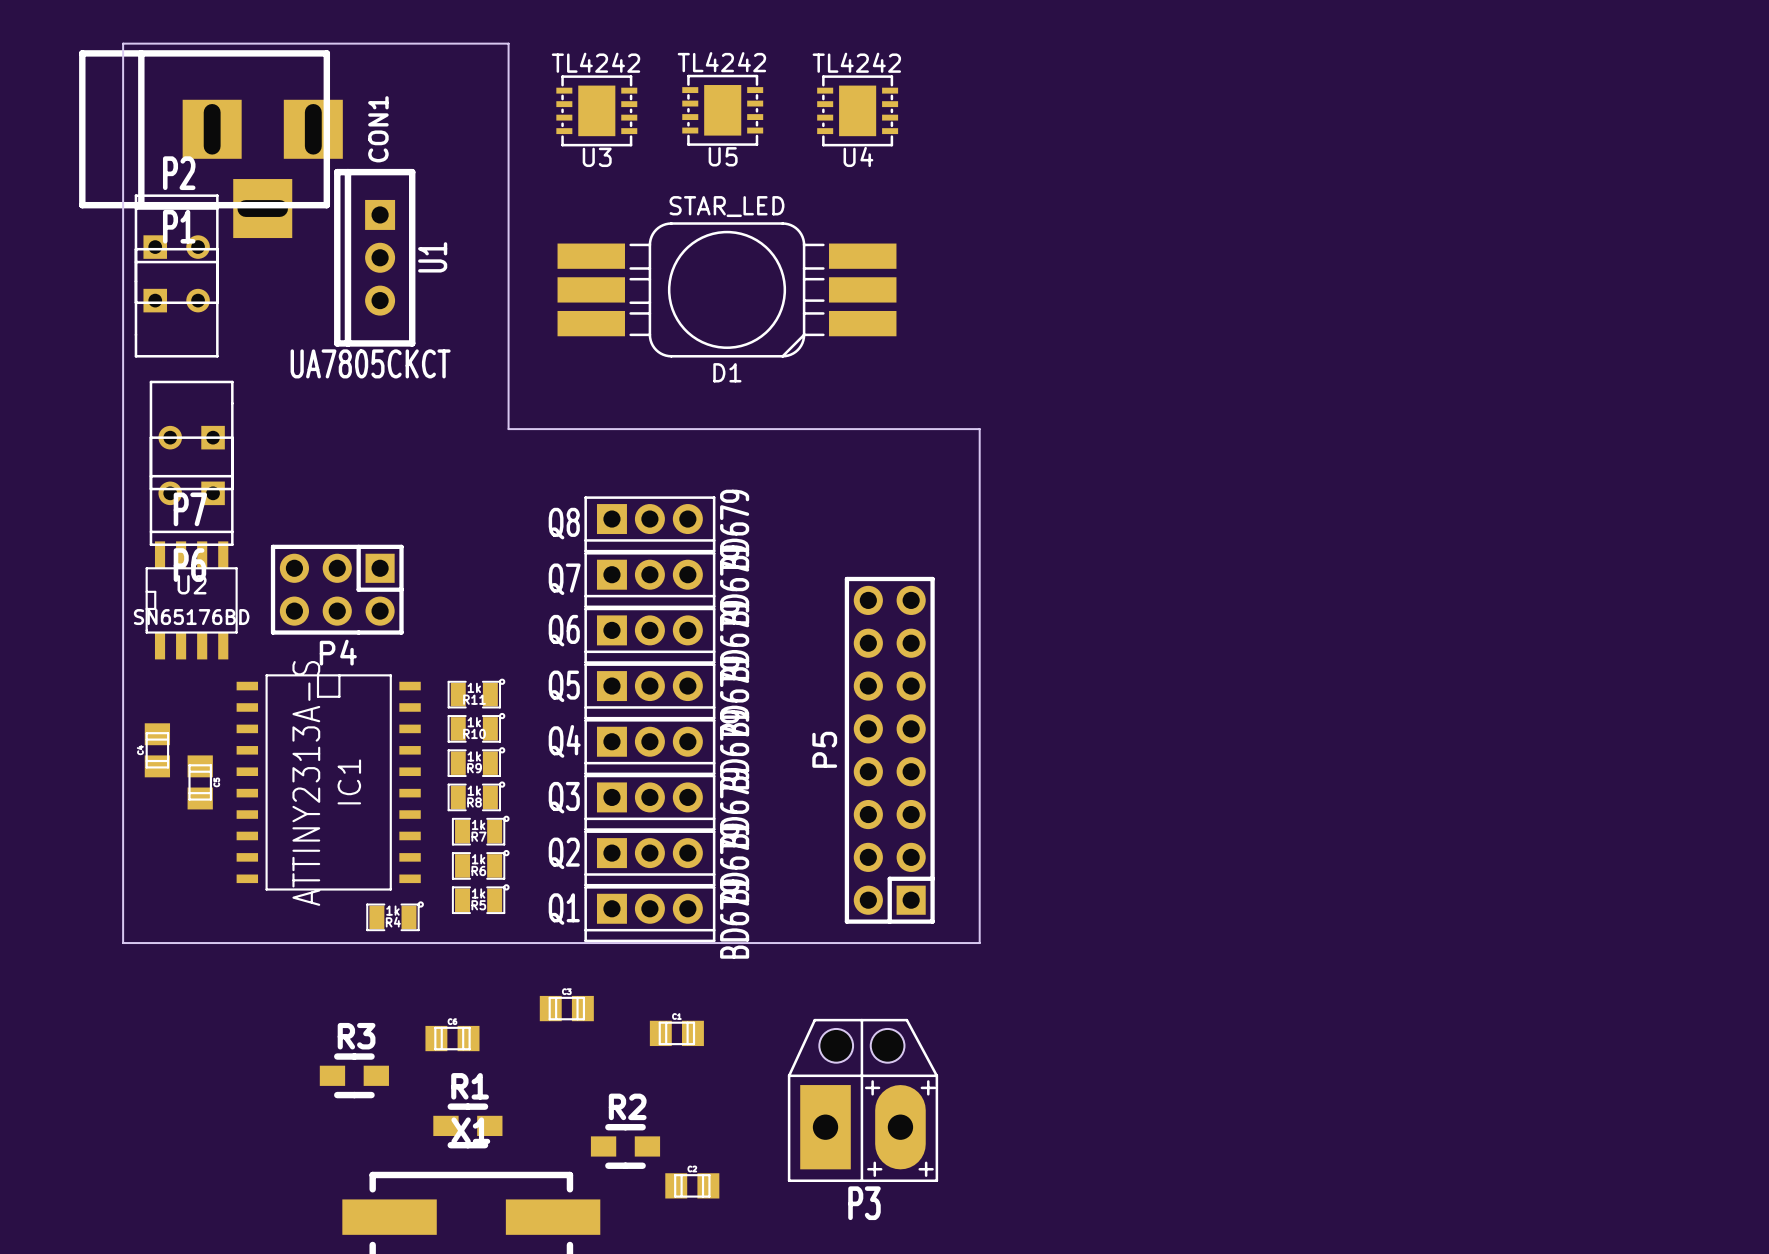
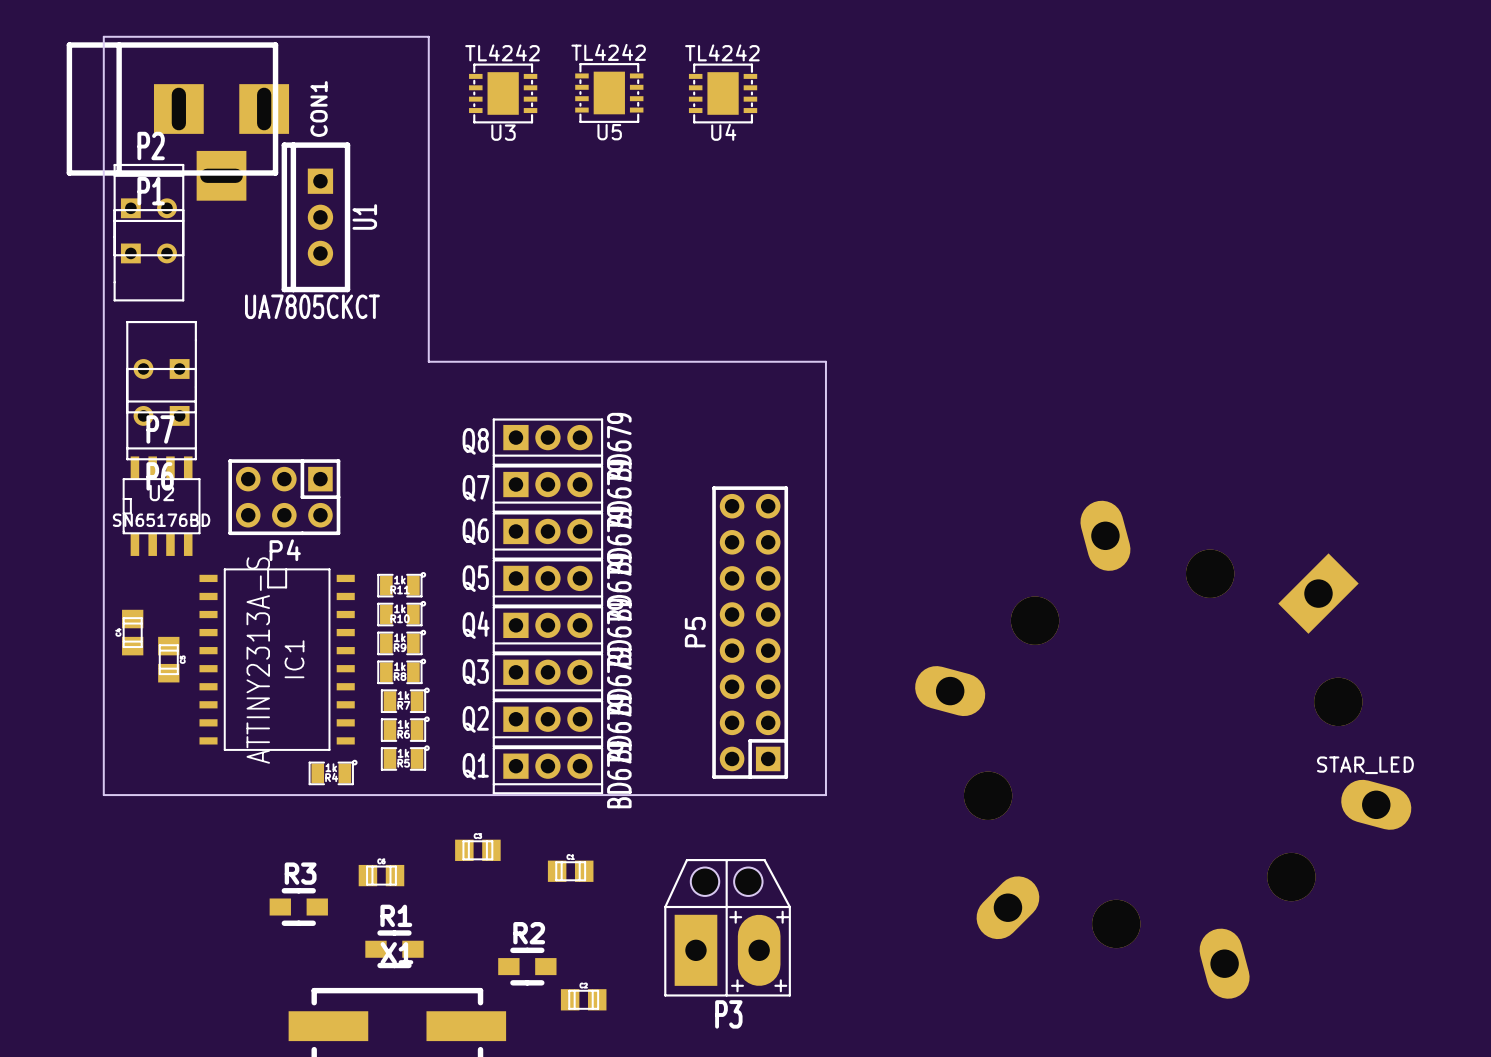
D1: STAR_LED (727, 289) -> none
part: none -> STAR_LED (1163, 749)

